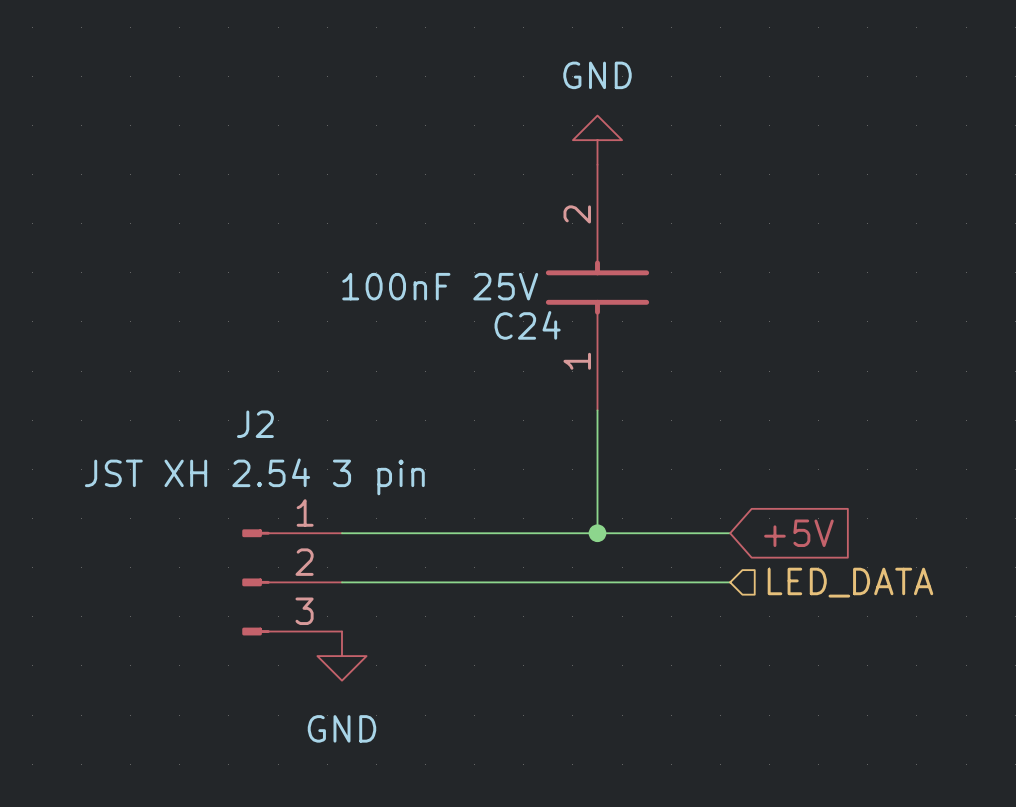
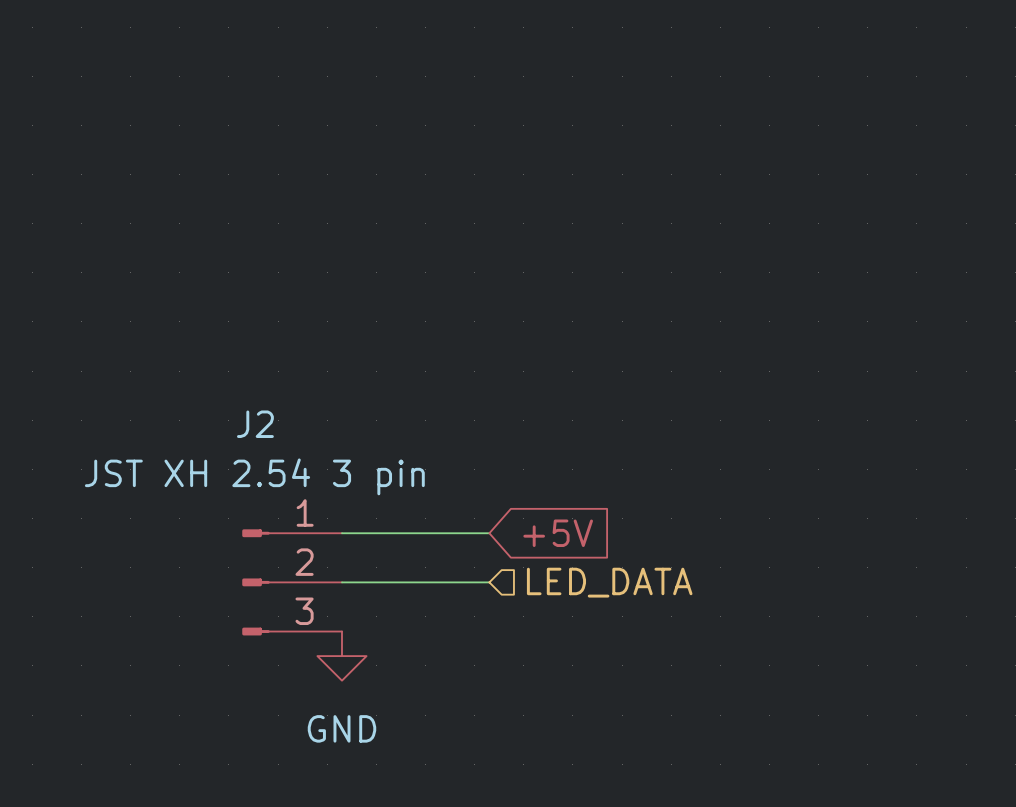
power symbol: GND (597, 140) -> none
C24: 100nF 25V (597, 287) -> none
wire: (597, 410) (597, 533) -> none
wire: (489, 533) (730, 533) -> none
junction: (597, 533) -> none
global label position: +5V (798, 533) -> +5V (558, 533)
wire: (489, 582) (730, 582) -> none
hierarchical label position: LED_DATA (850, 582) -> LED_DATA (609, 582)

